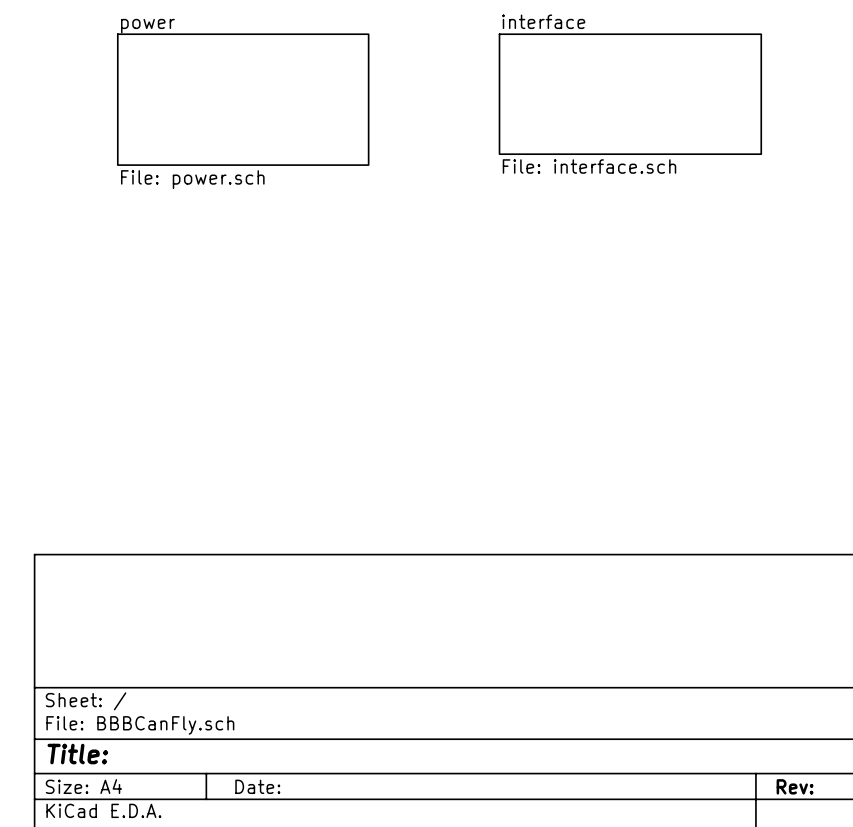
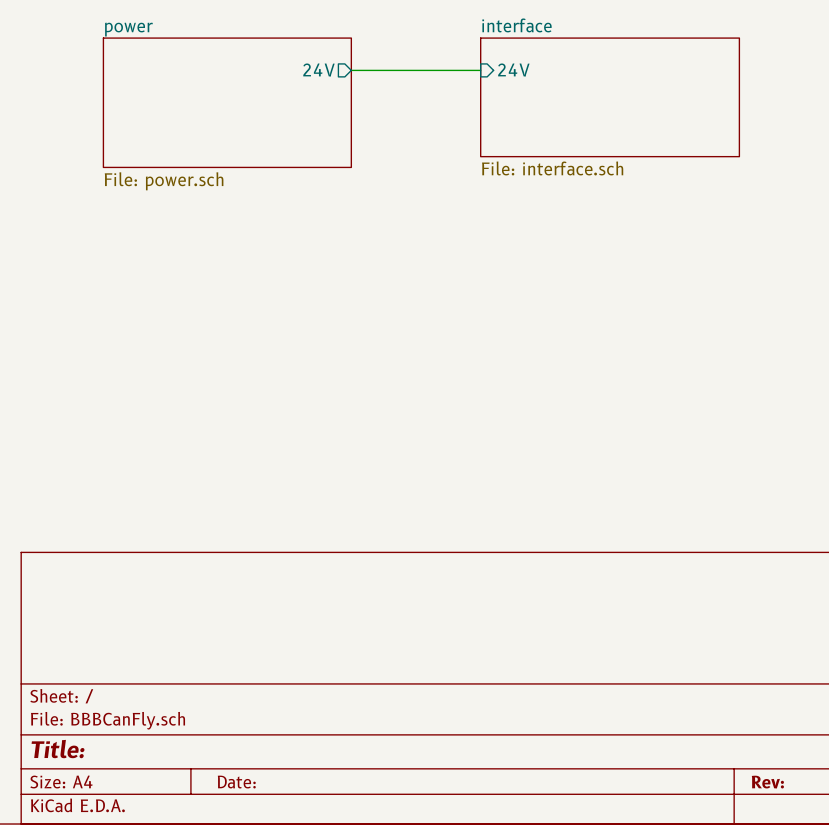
sheet pin: none -> 24V (318, 70)
wire: none -> (351, 70) (480, 70)
sheet pin: none -> 24V (513, 70)

